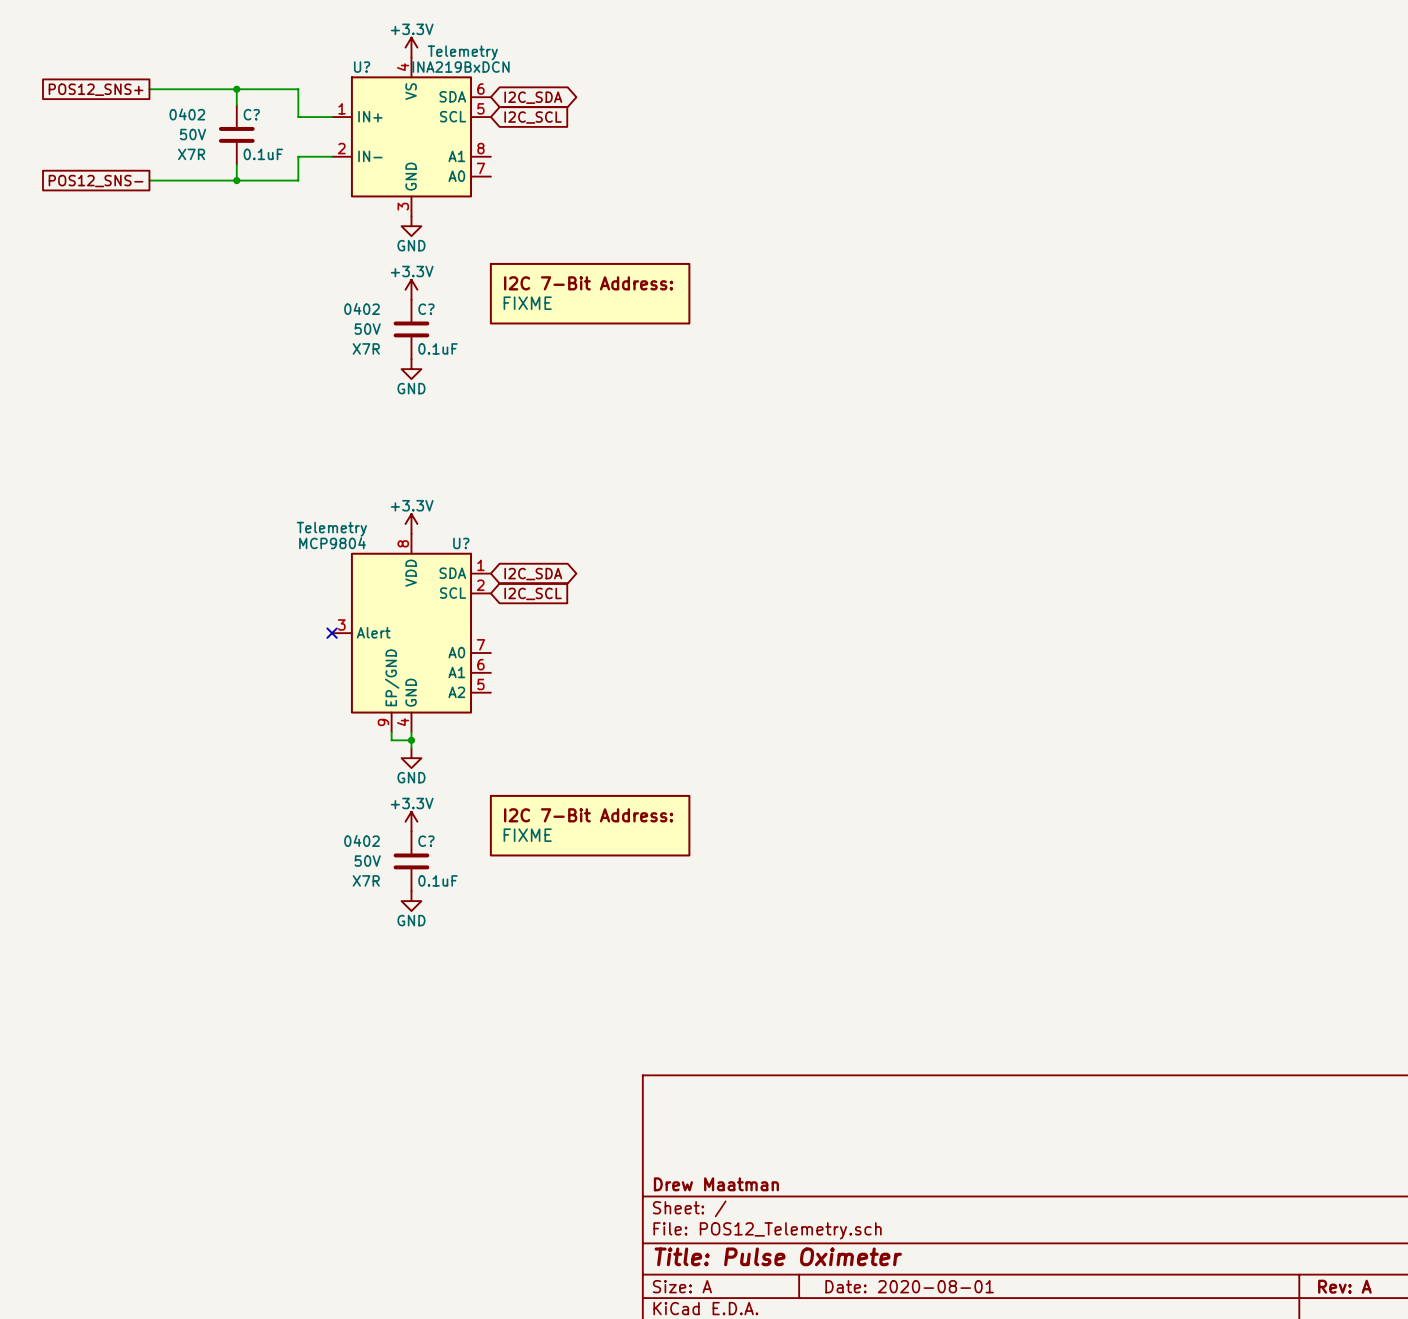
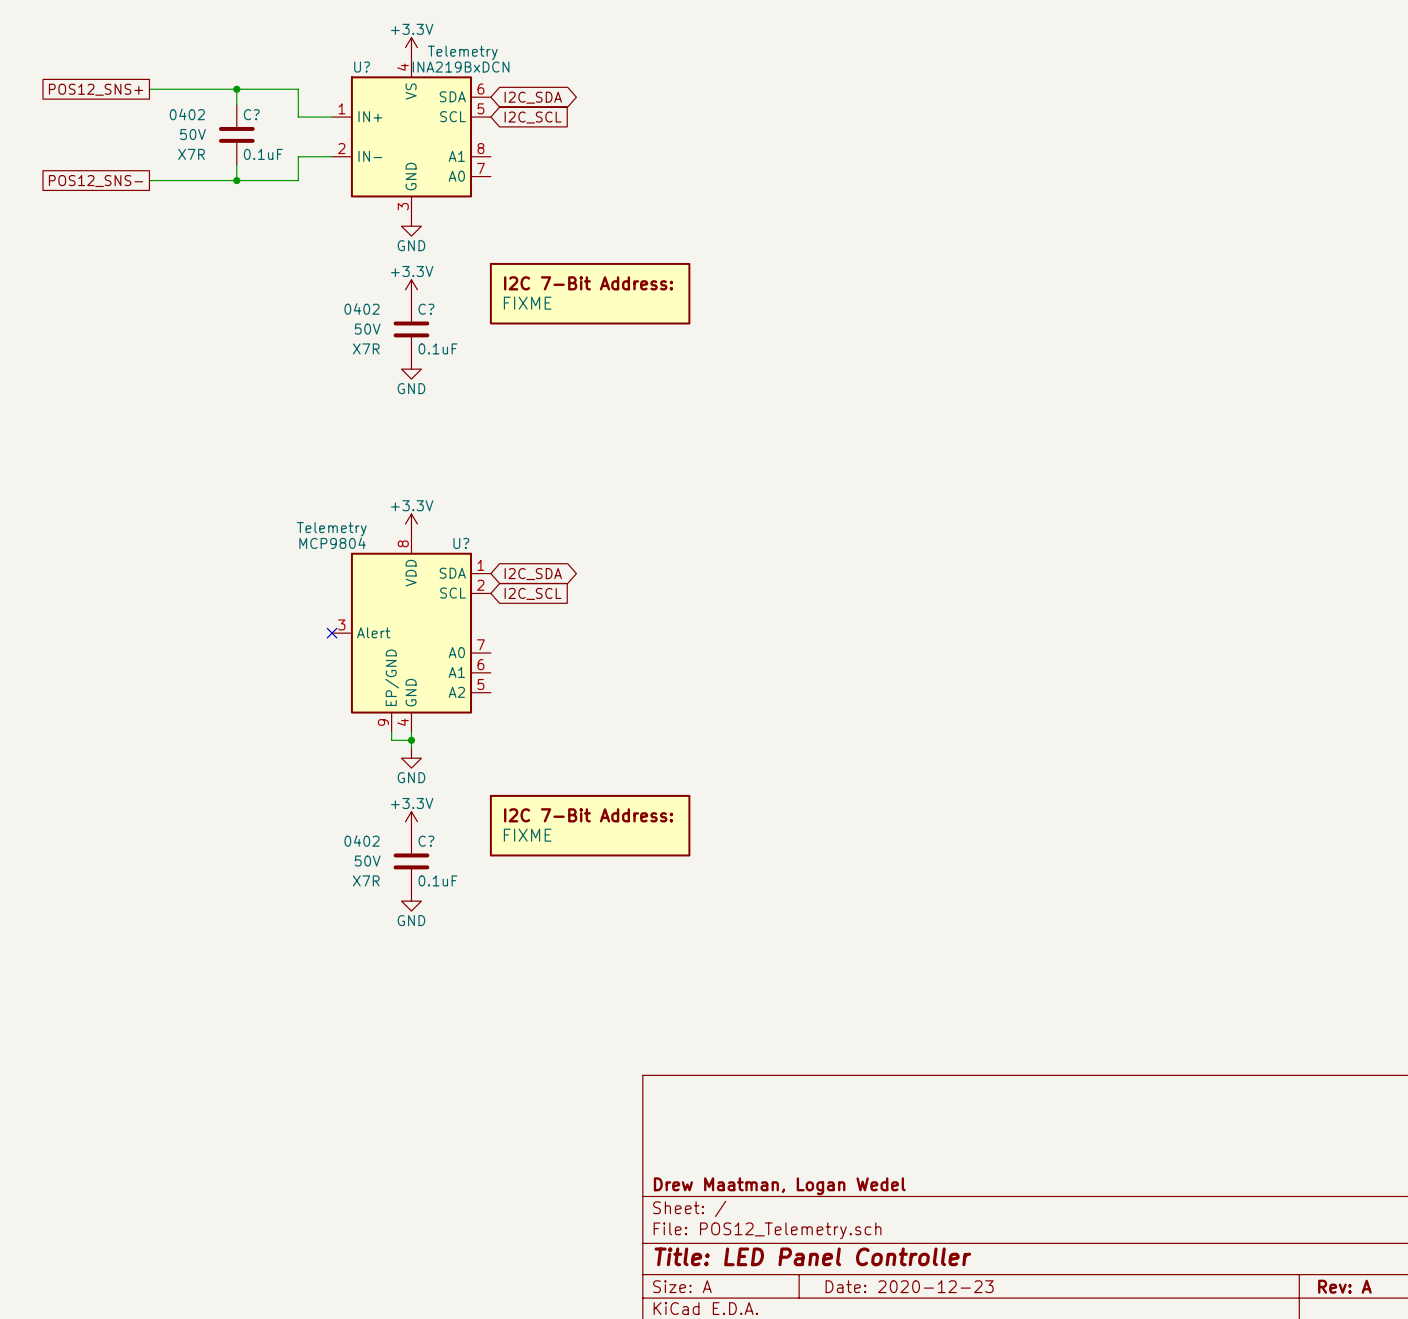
title block: Drew Maatman (716, 1184) -> Drew Maatman, Logan Wedel (779, 1186)
title block: Title: Pulse Oximeter (778, 1256) -> Title: LED Panel Controller (812, 1256)
title block: Date: 2020-08-01 (909, 1286) -> Date: 2020-12-23 (909, 1286)

